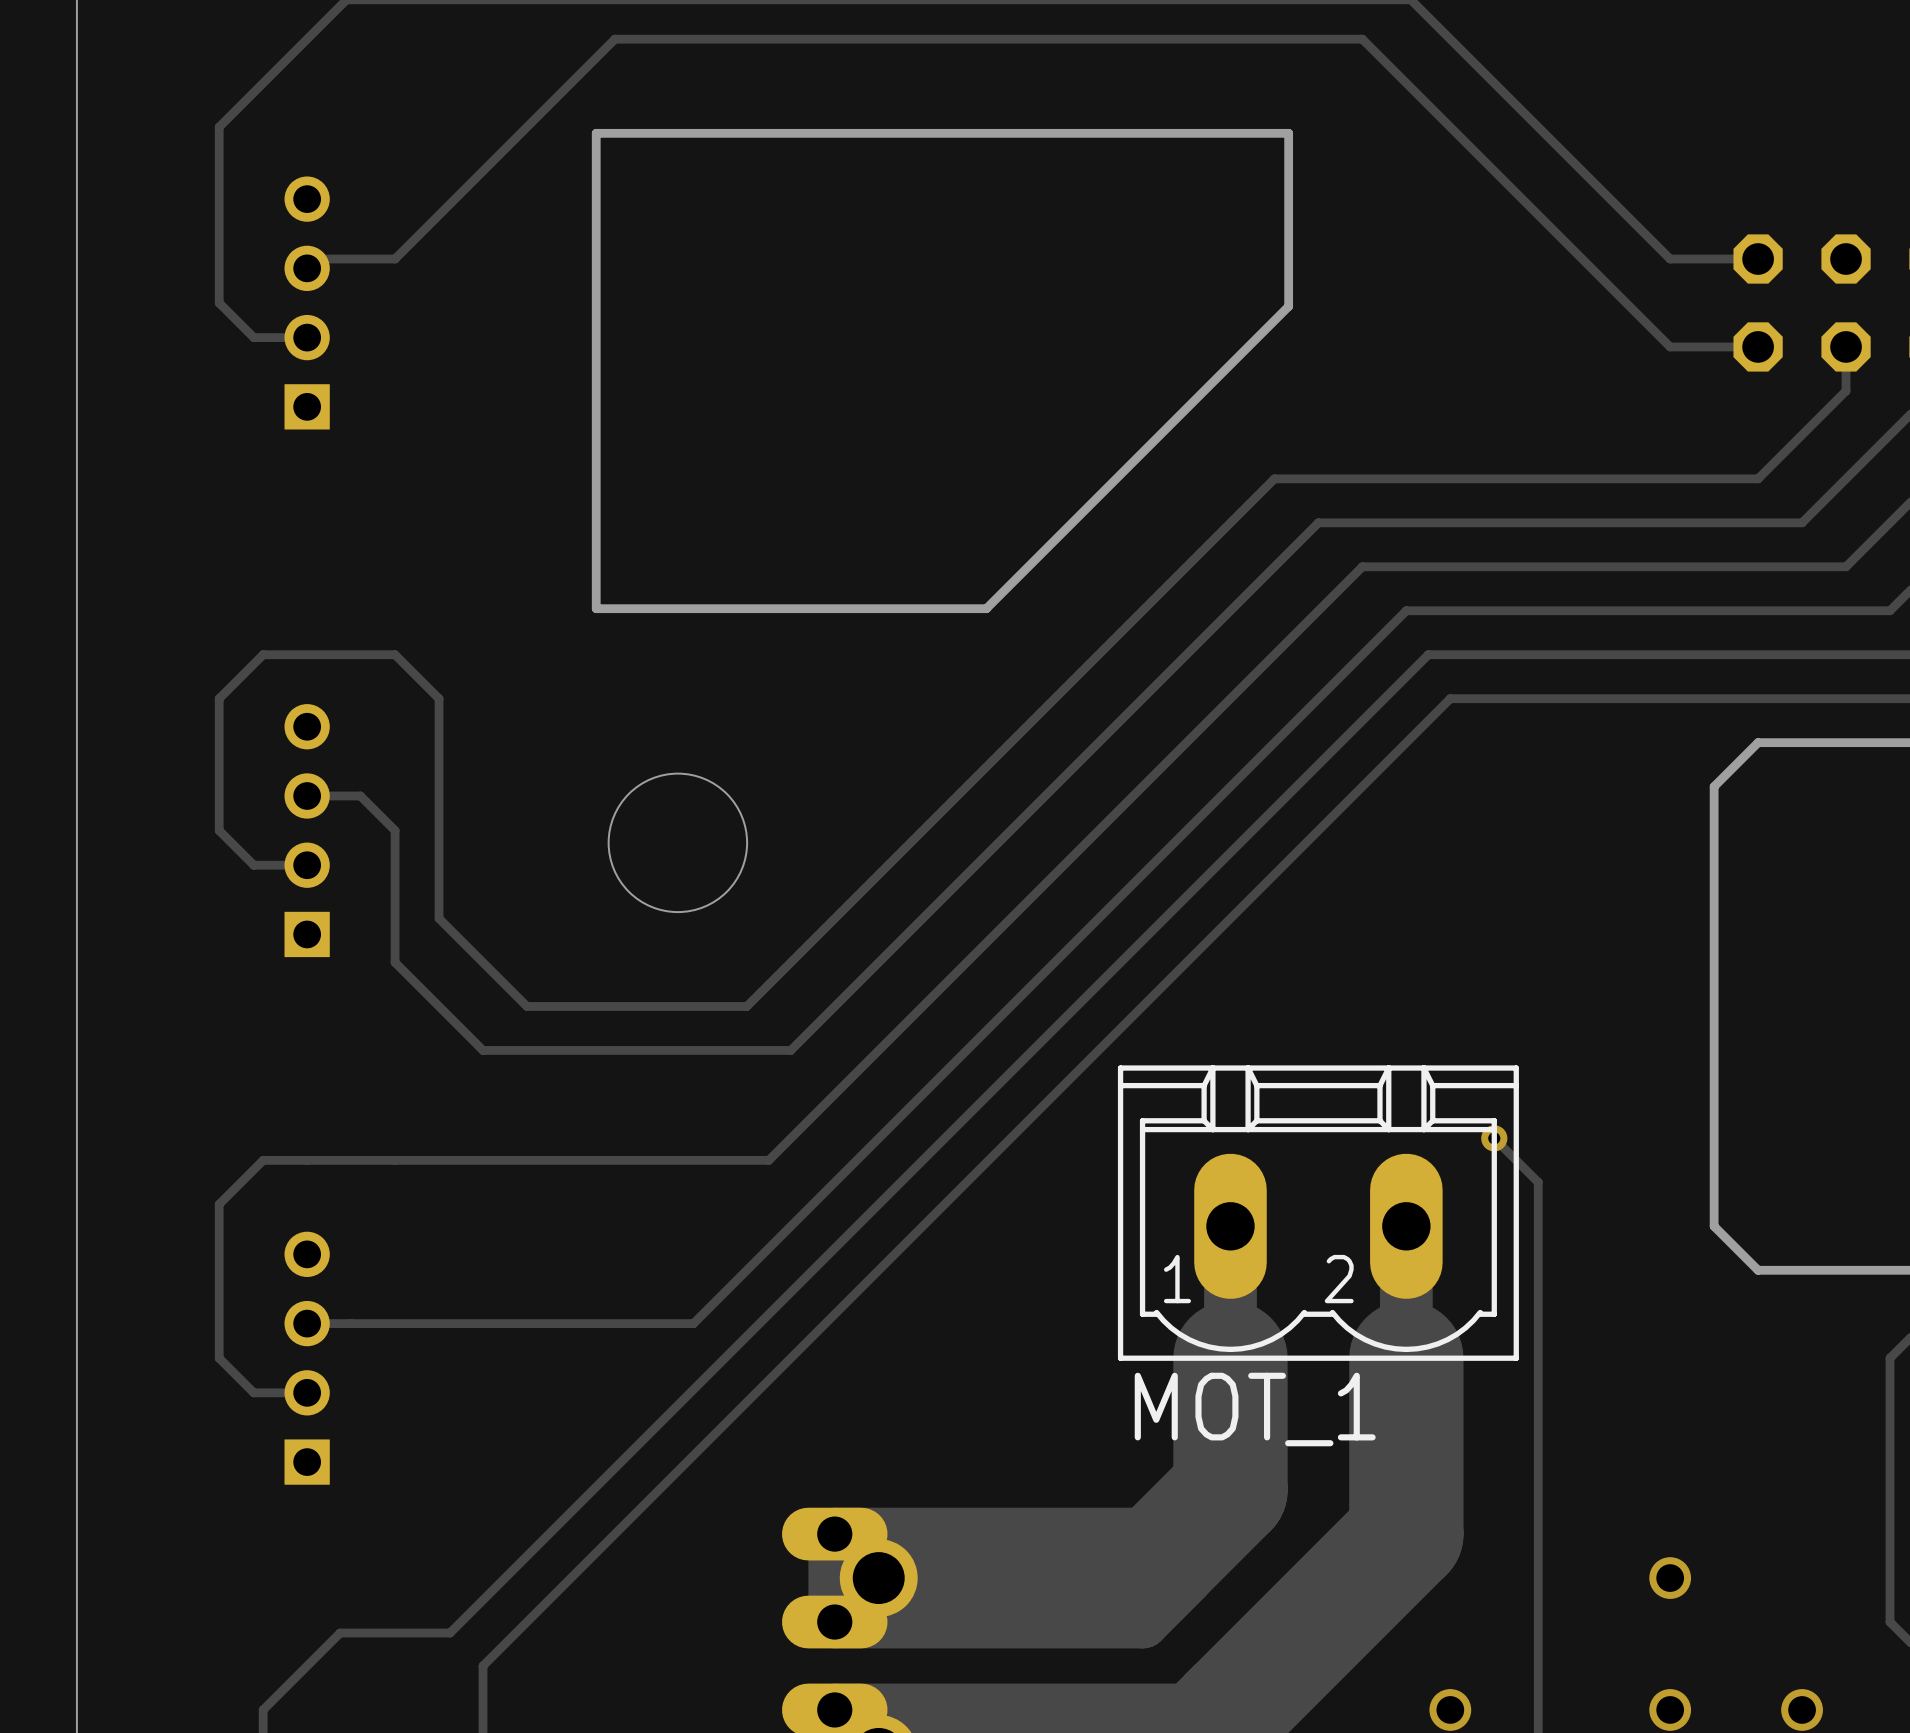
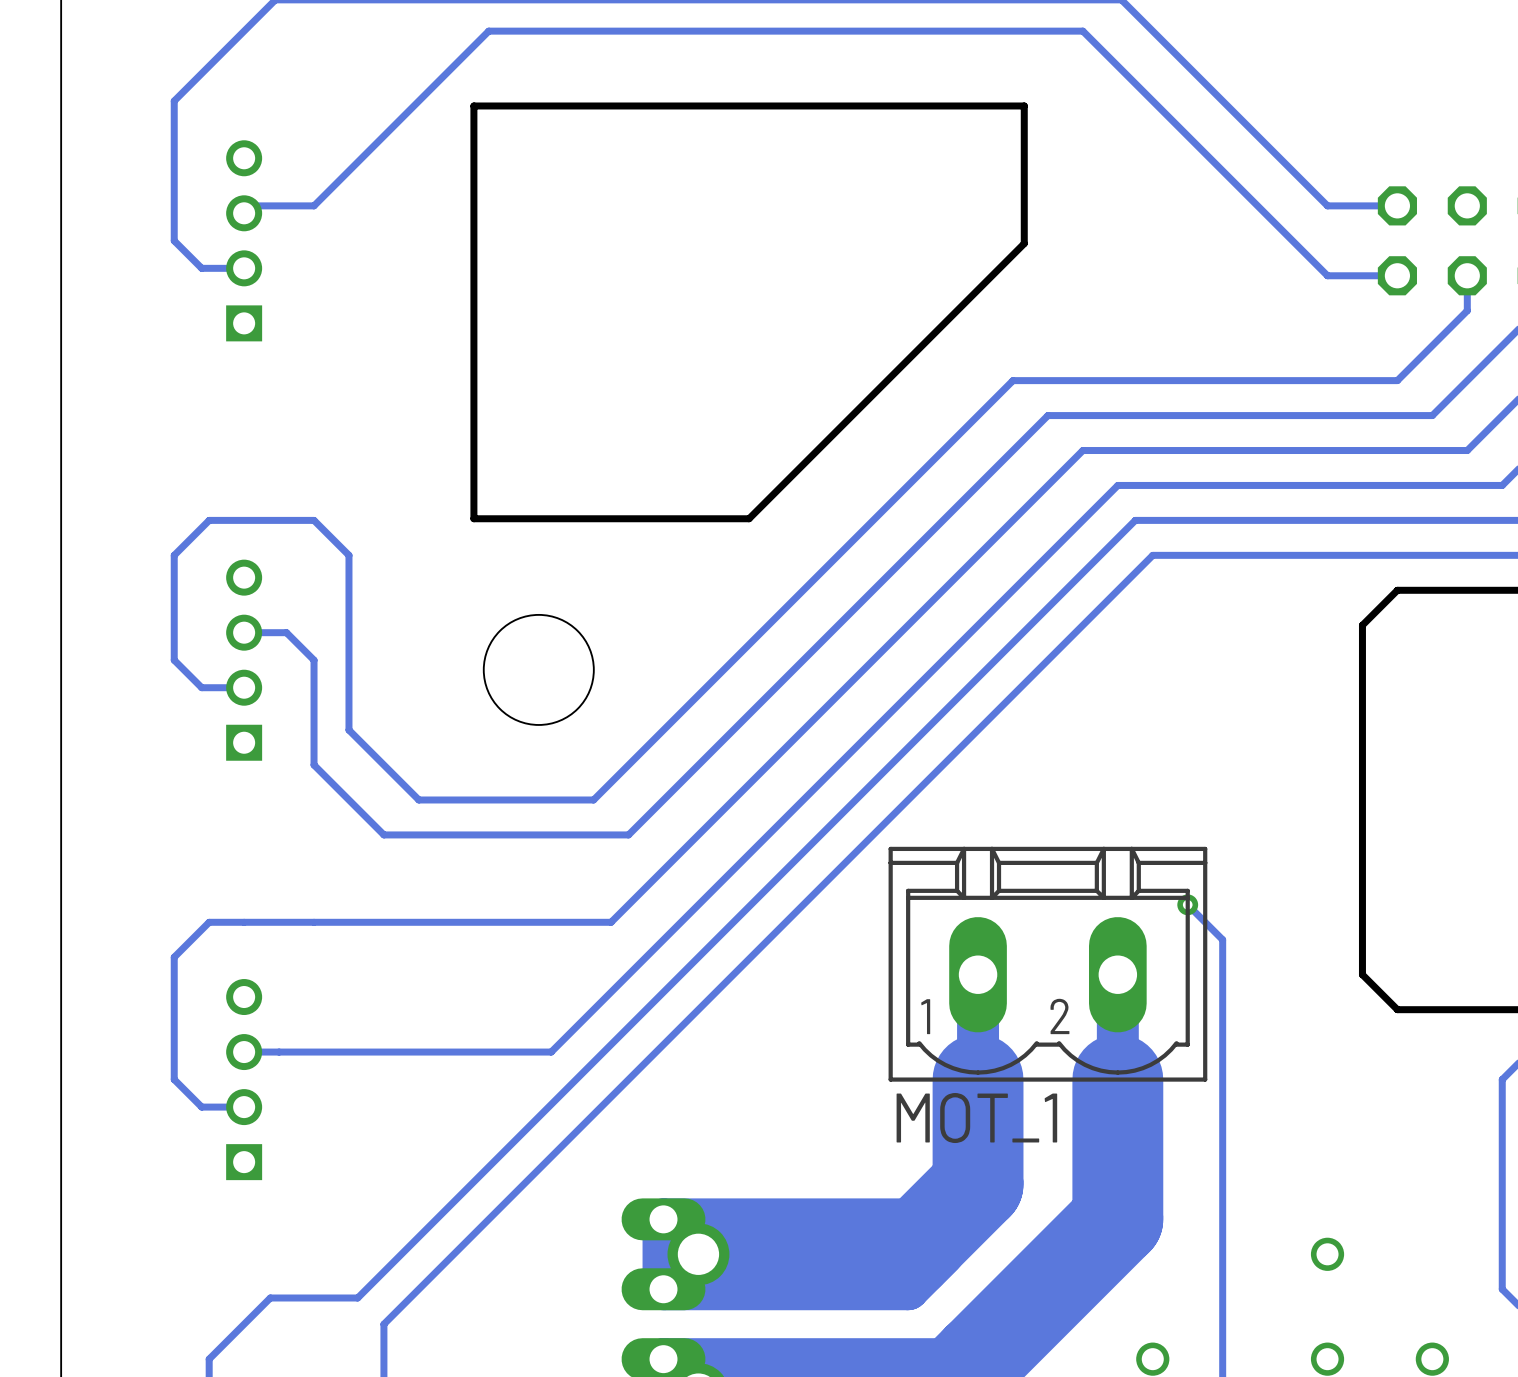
board edge: (986, 608) (596, 608) -> (784, 483) (749, 518) (473, 518) (473, 483)

